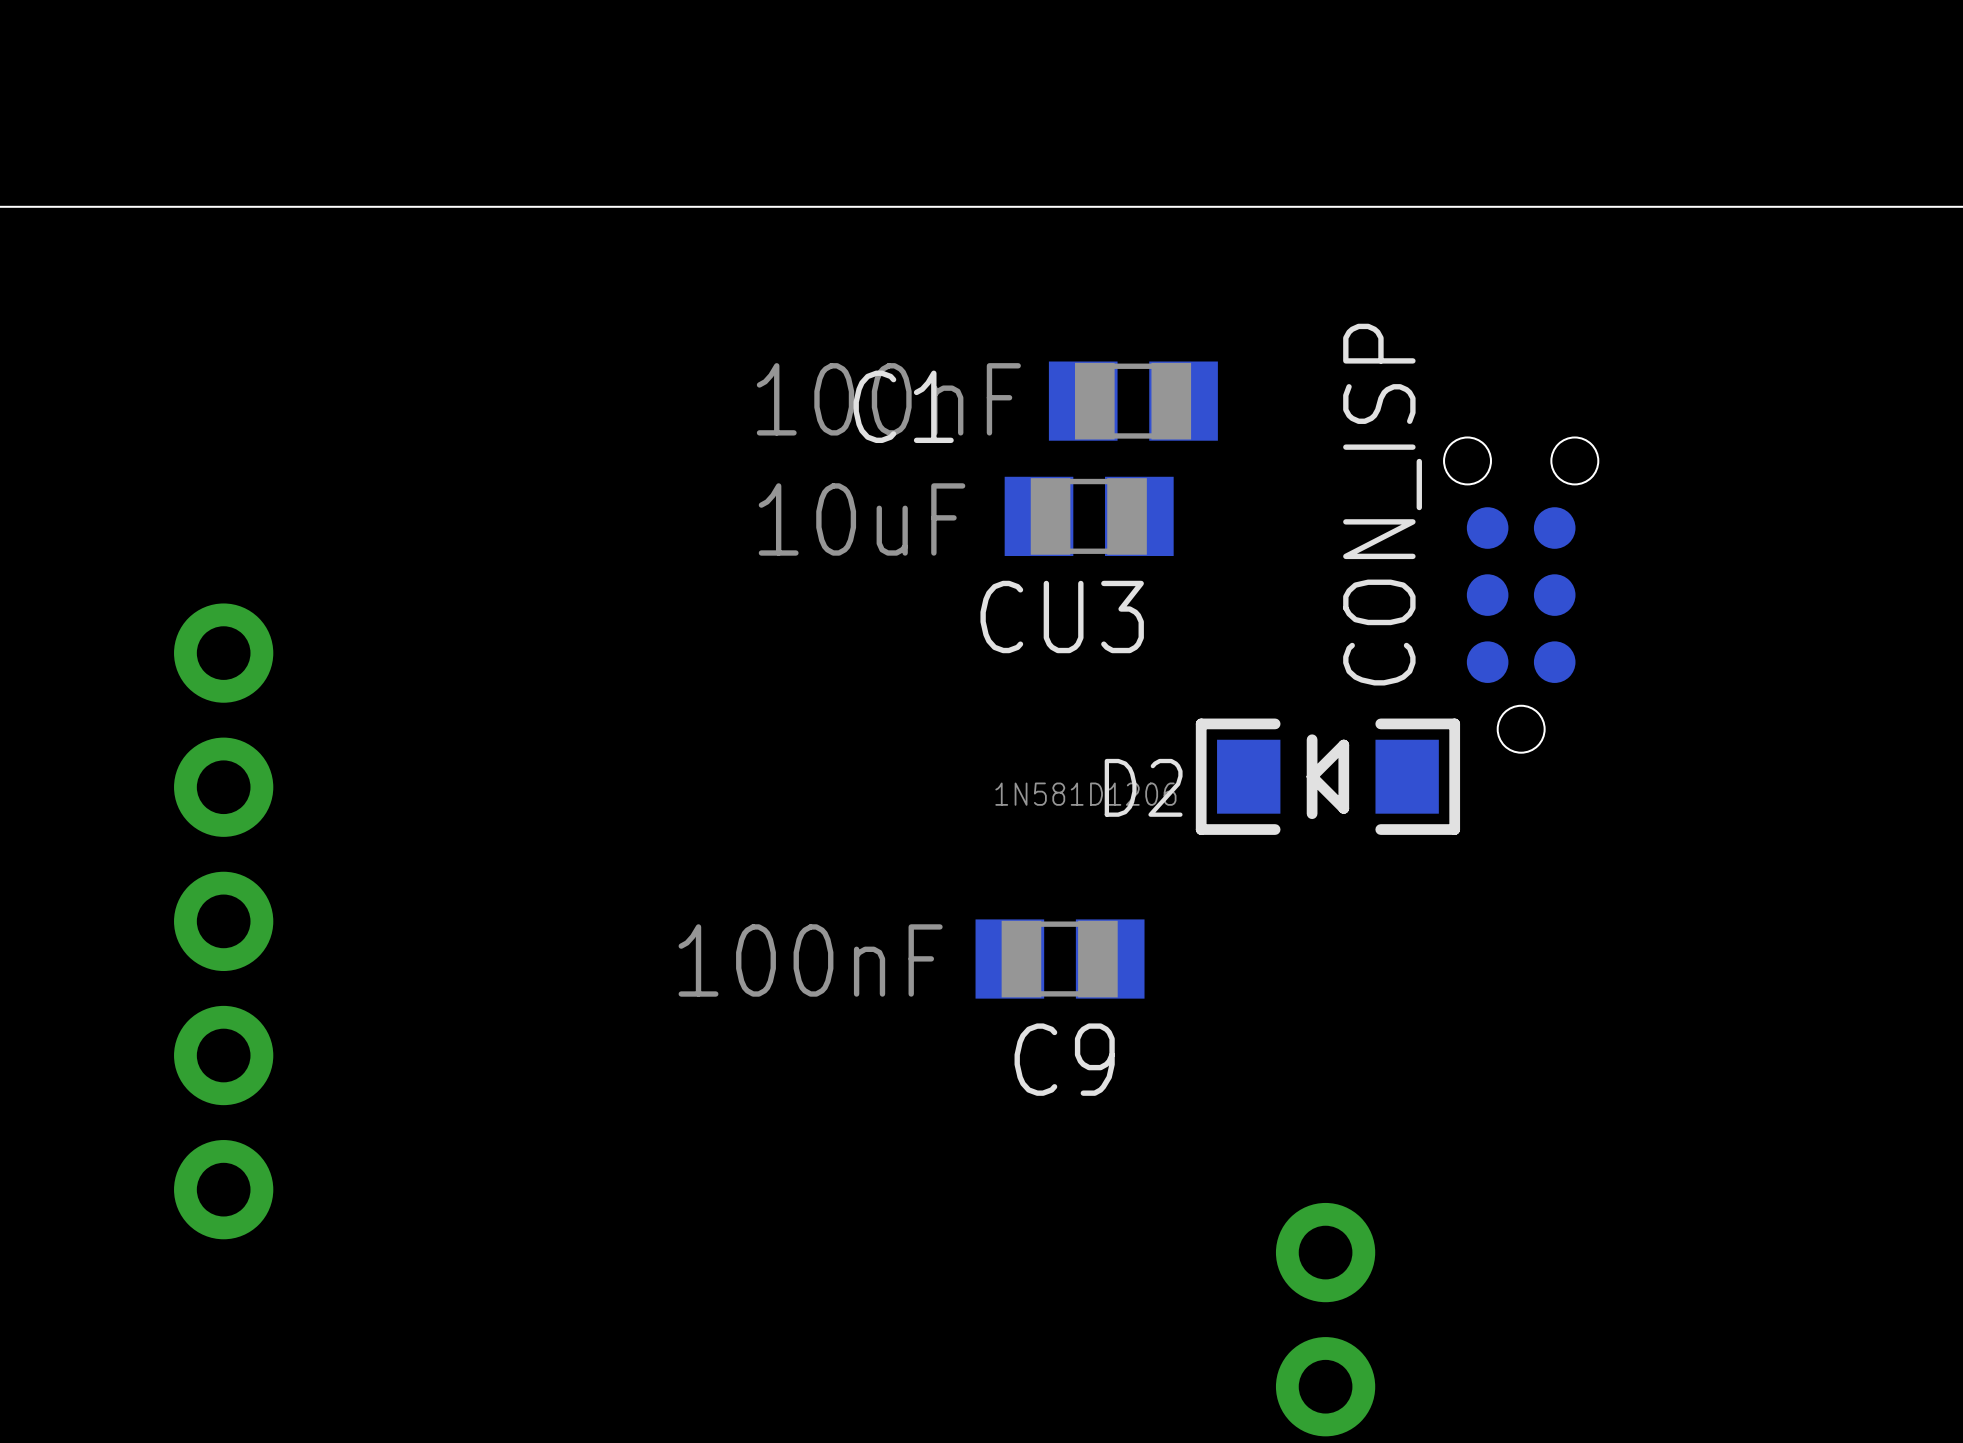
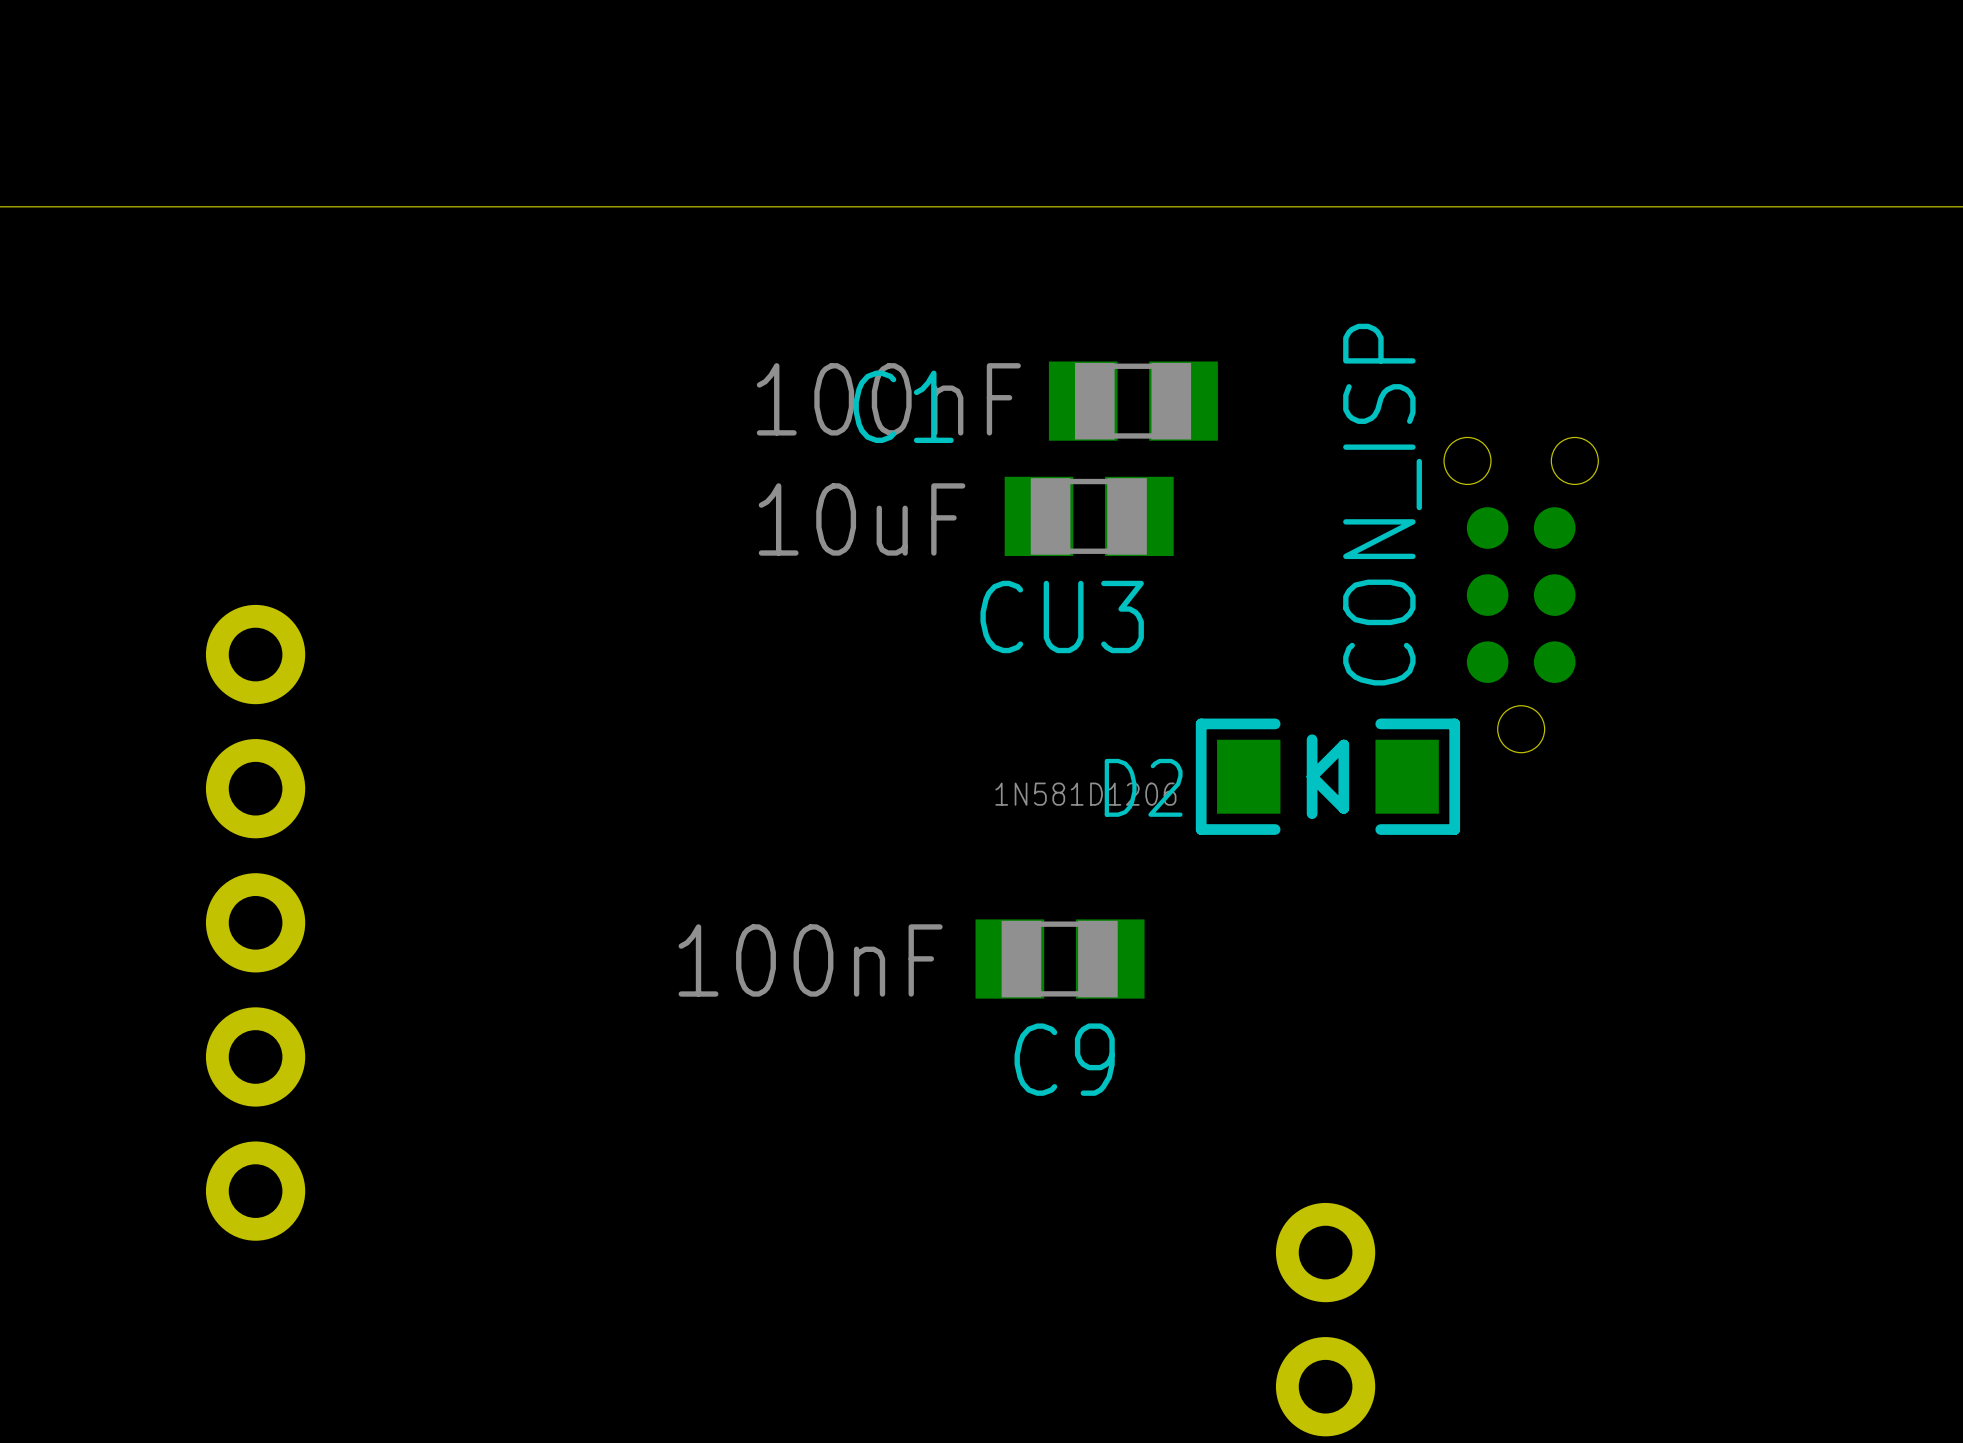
part position: (223, 921) -> (255, 922)

